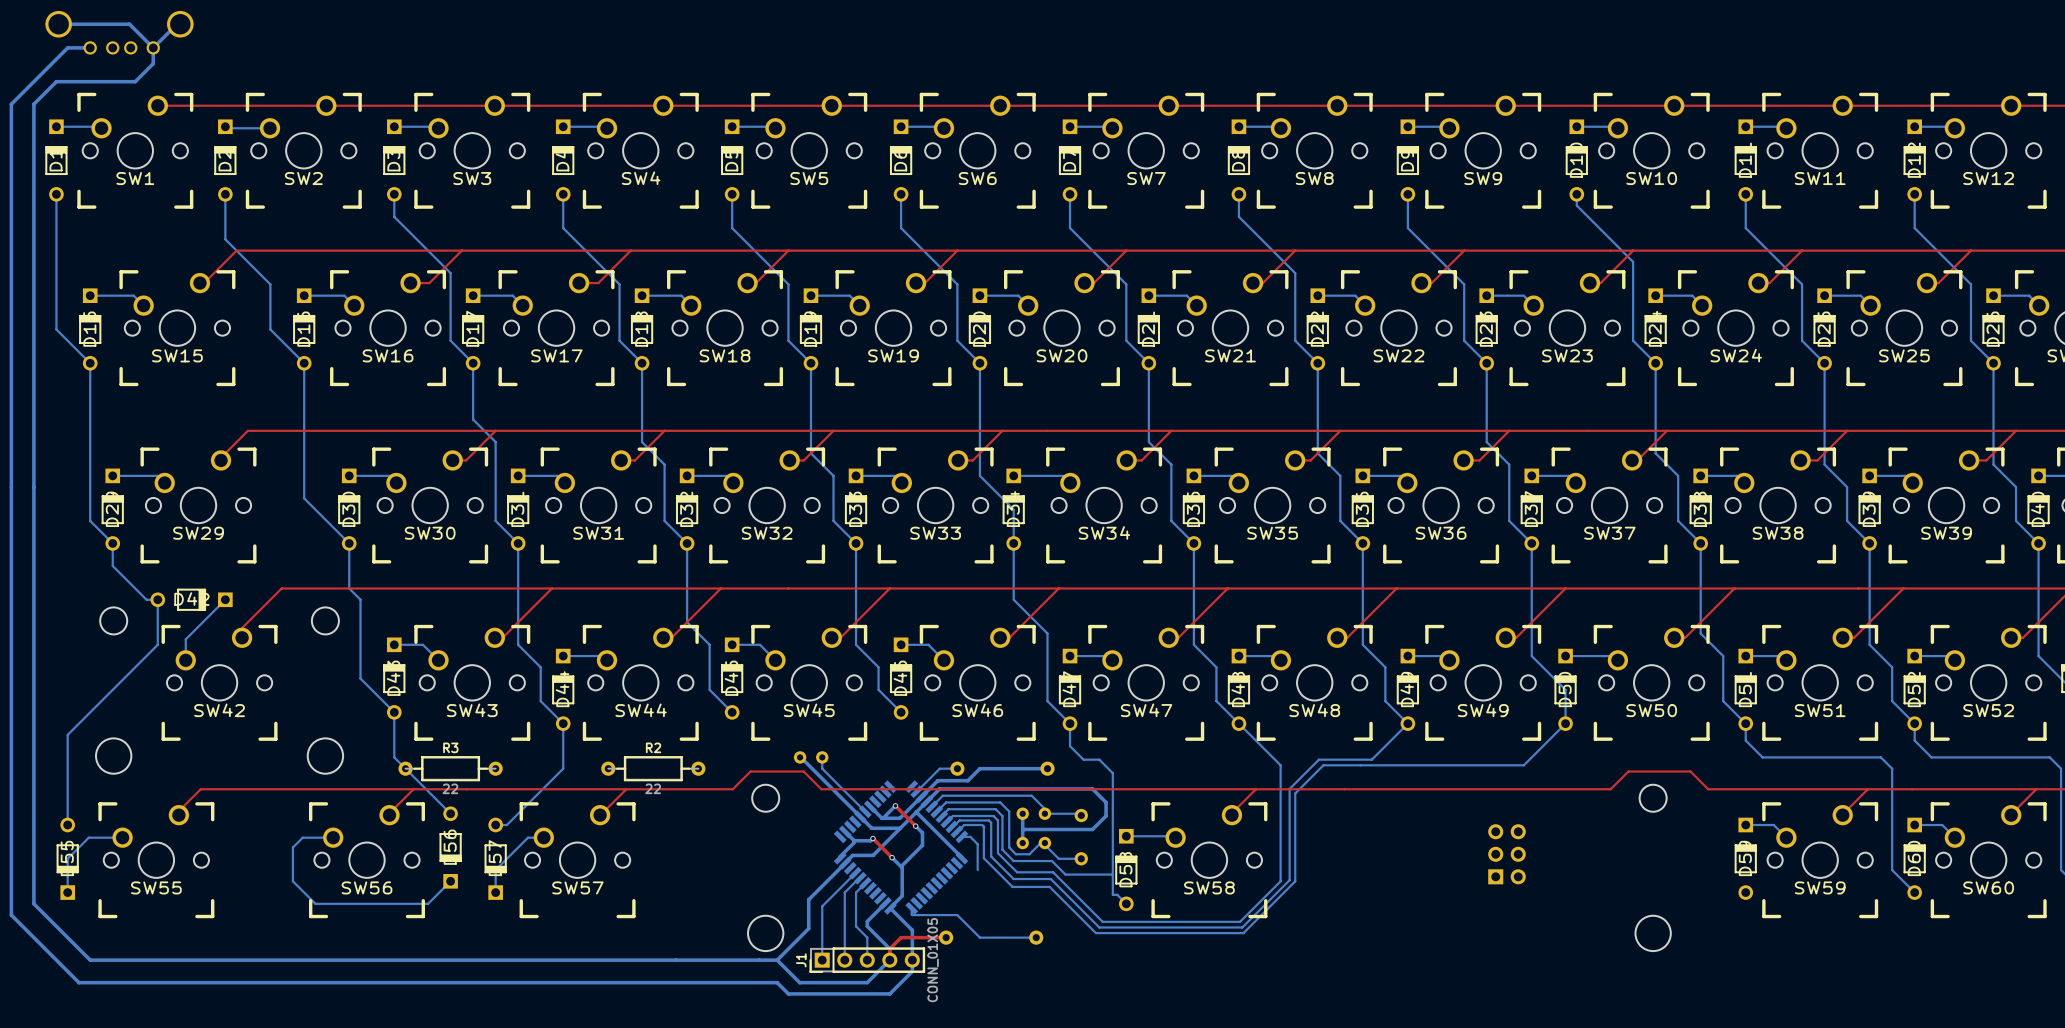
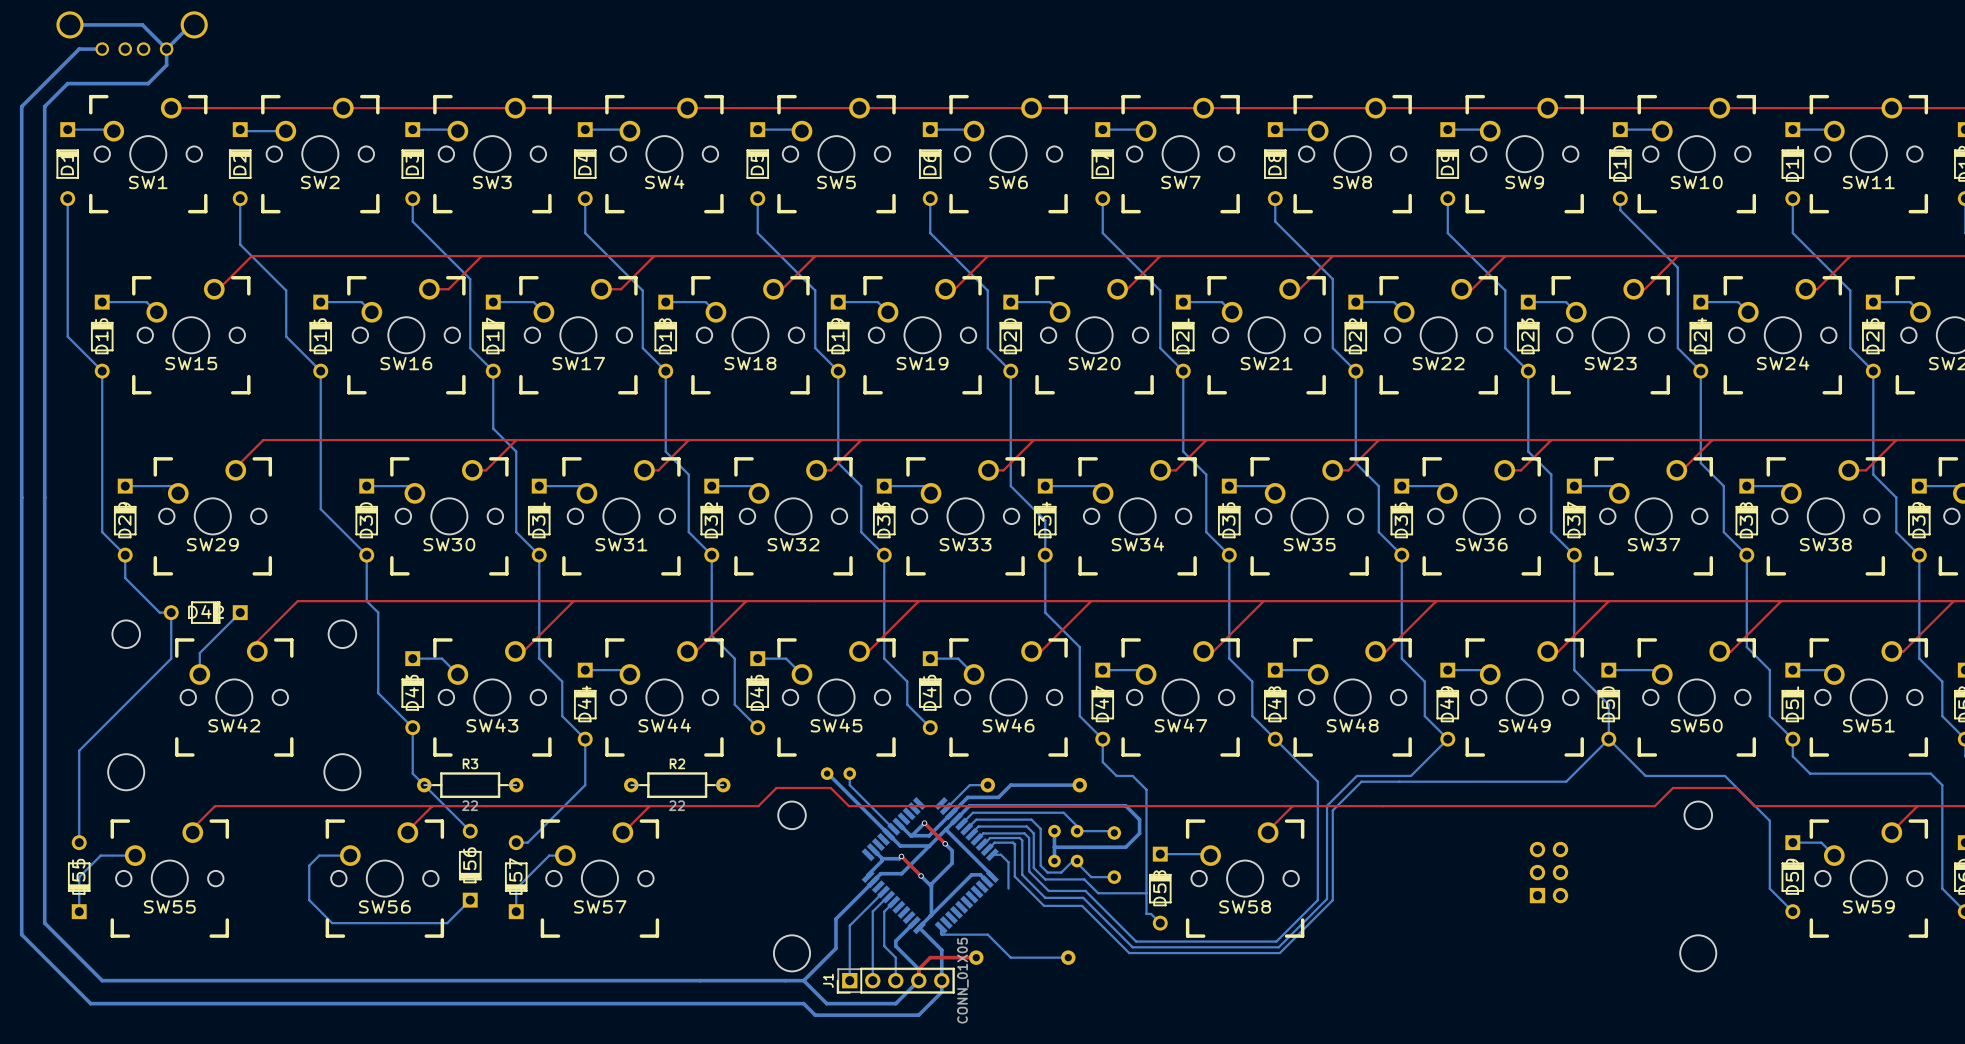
bottom track: none -> (1608, 739) (1645, 775) (1724, 775) (1769, 820) (1769, 888) (1792, 911)
bottom track: none -> (987, 881) (980, 874) (971, 874) (931, 915)

